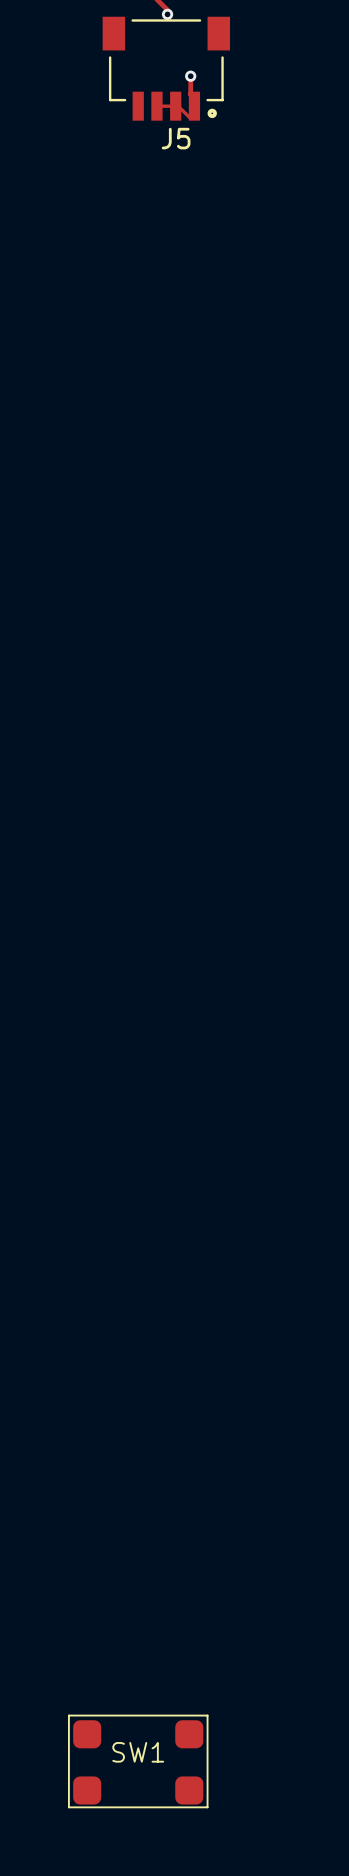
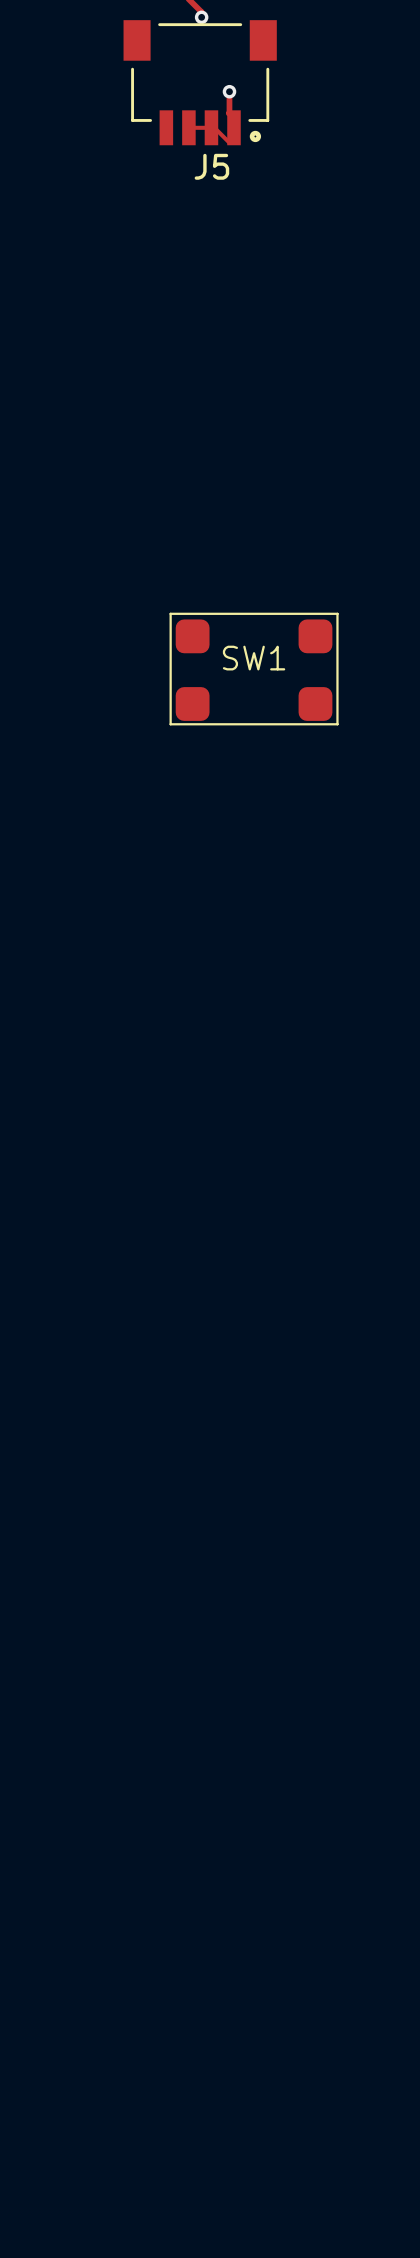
SW1 position: (138, 1761) -> (254, 669)

